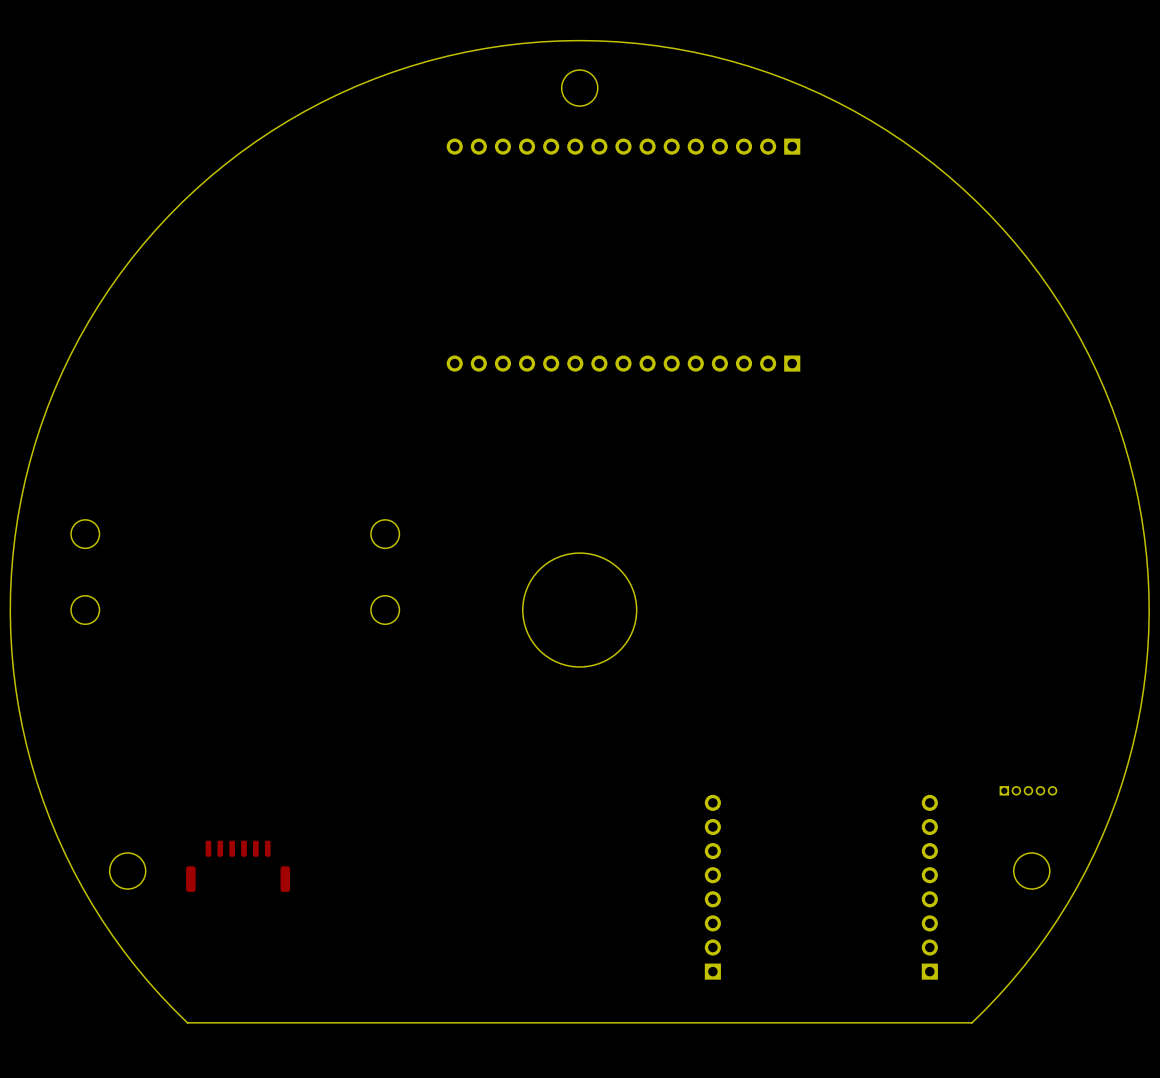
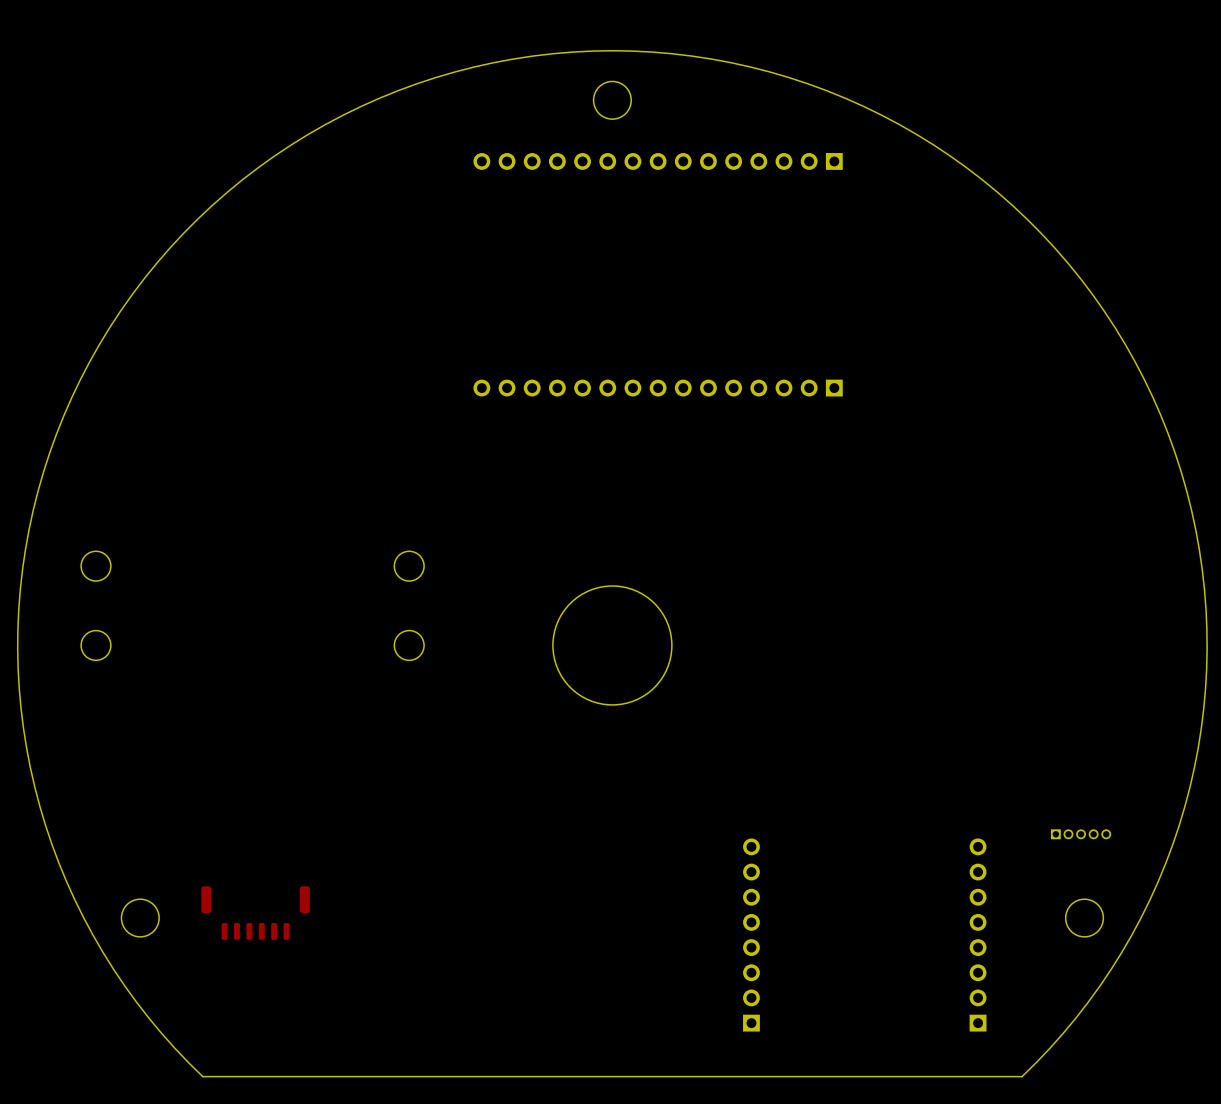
part rotation: 0° (238, 866) -> 180° (255, 913)

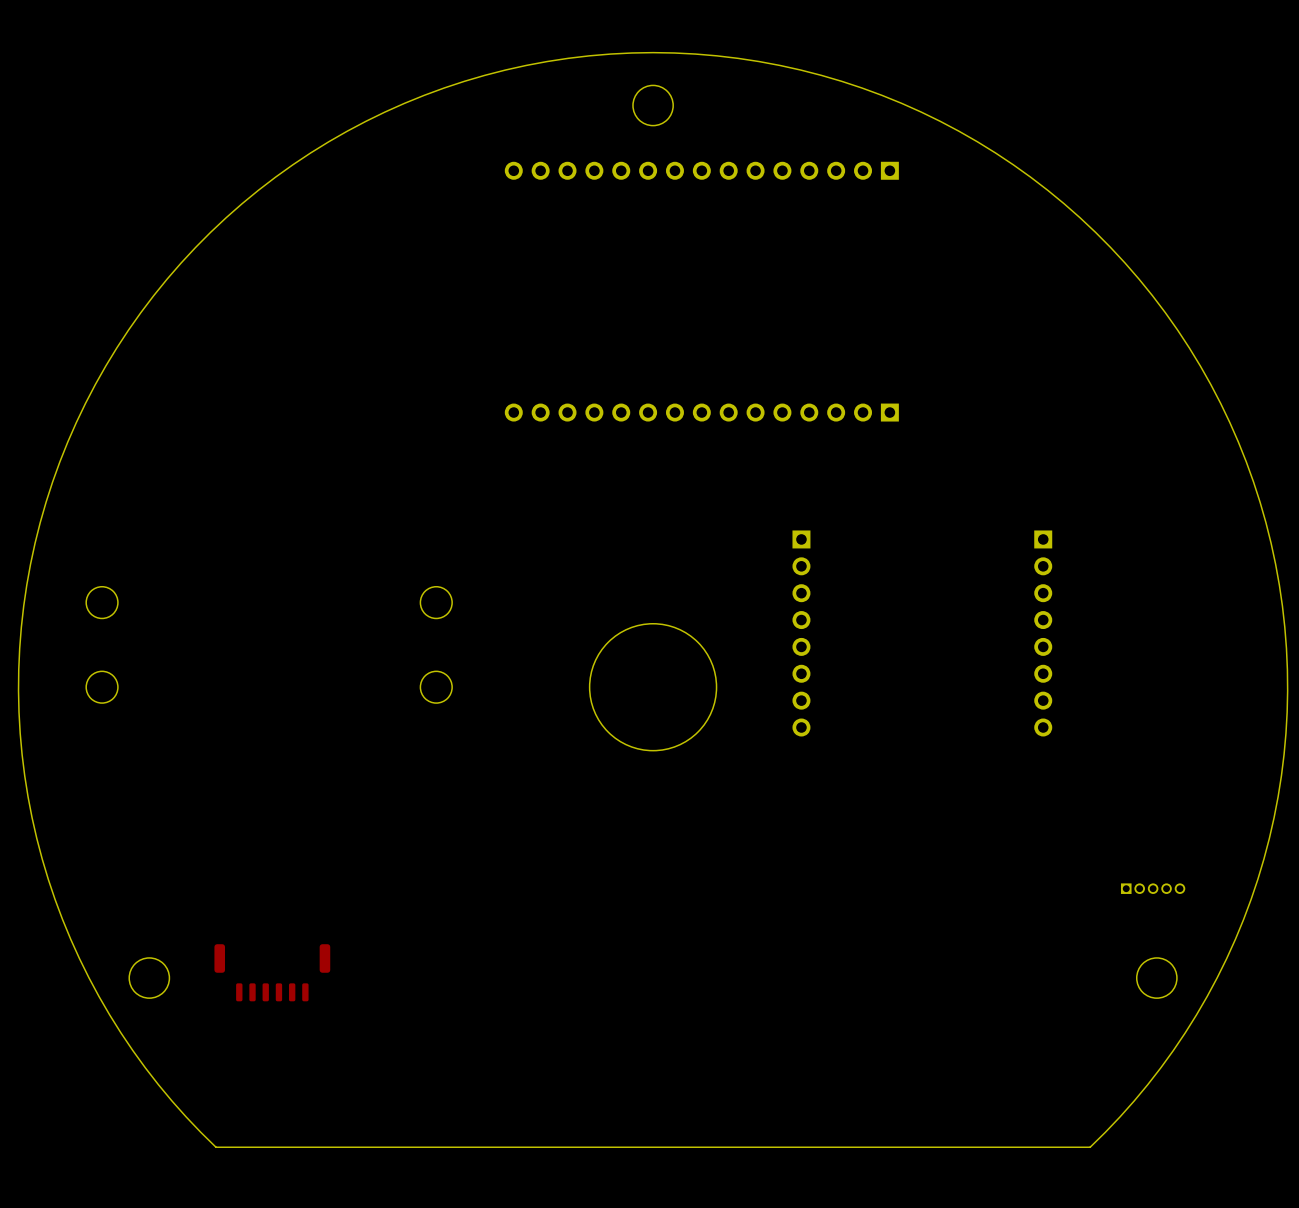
part: none -> (801, 633)
part: none -> (1043, 633)
part: (751, 934) -> none
part: (978, 934) -> none

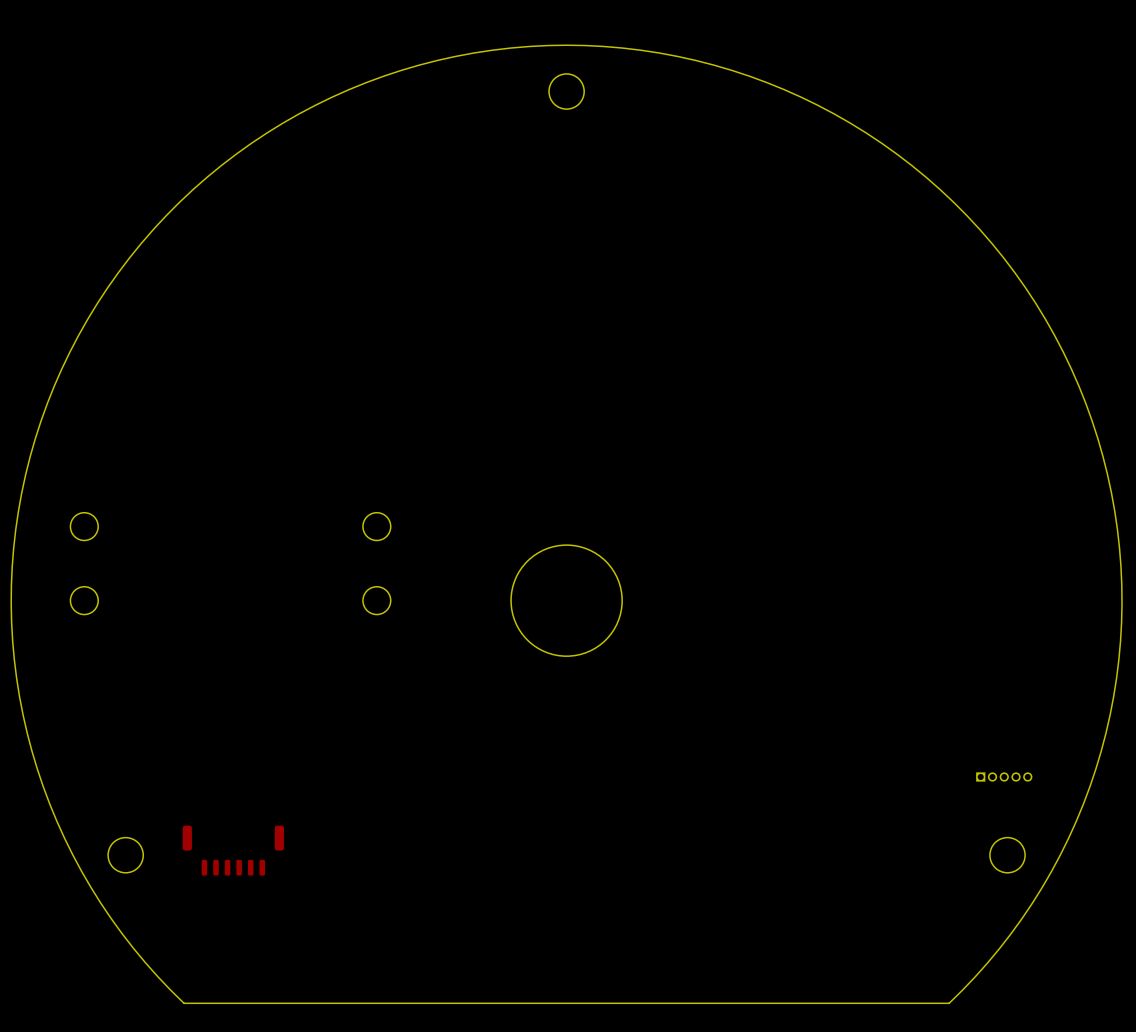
part: (701, 170) -> none
part: (701, 412) -> none
part: (801, 633) -> none
part: (1043, 633) -> none

